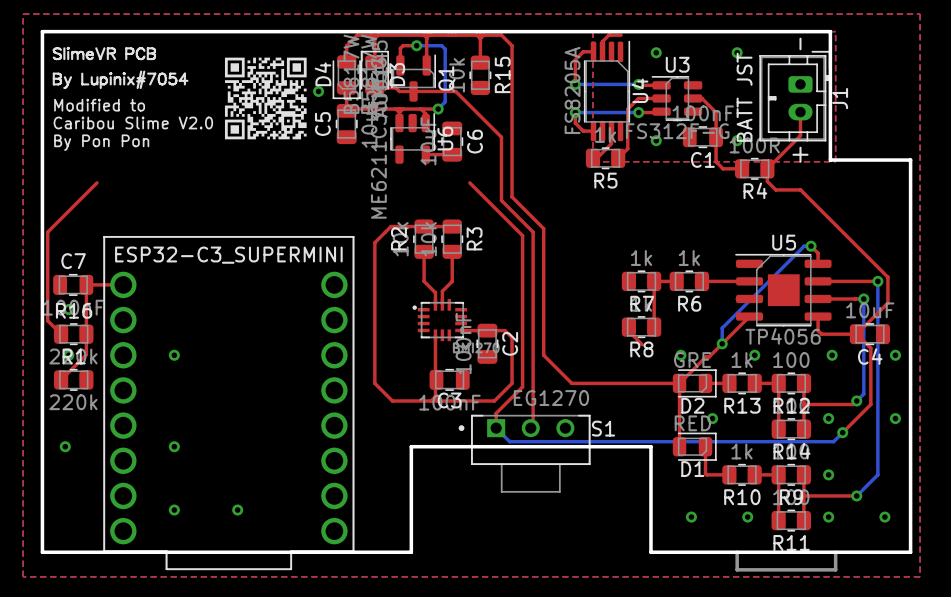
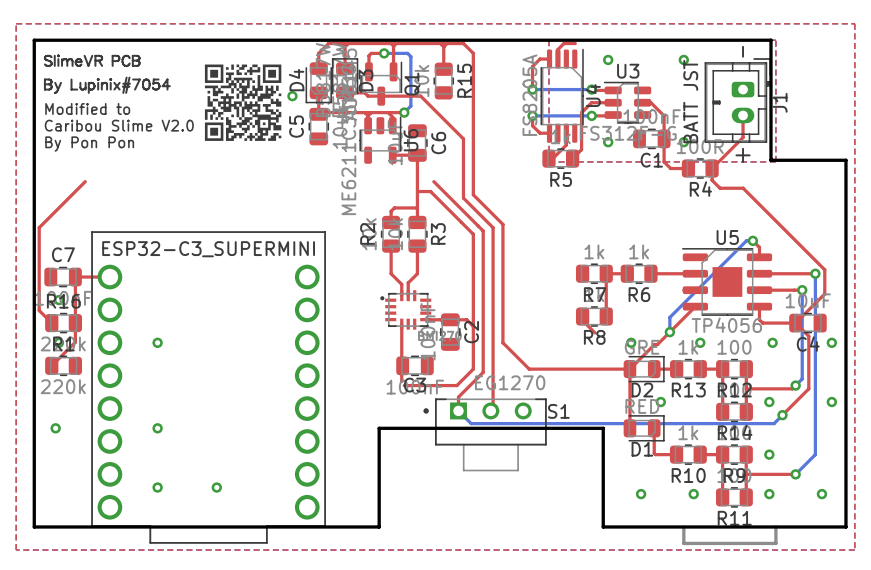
top track: none -> (417, 191) (430, 191) (473, 234) (473, 326)
top track: none -> (417, 207) (394, 207) (391, 211) (391, 222)
top track: (452, 226) (391, 226) (374, 242) (374, 383) (392, 400) (438, 400) (438, 399) (435, 396) (431, 400) -> (417, 222) (417, 155)

